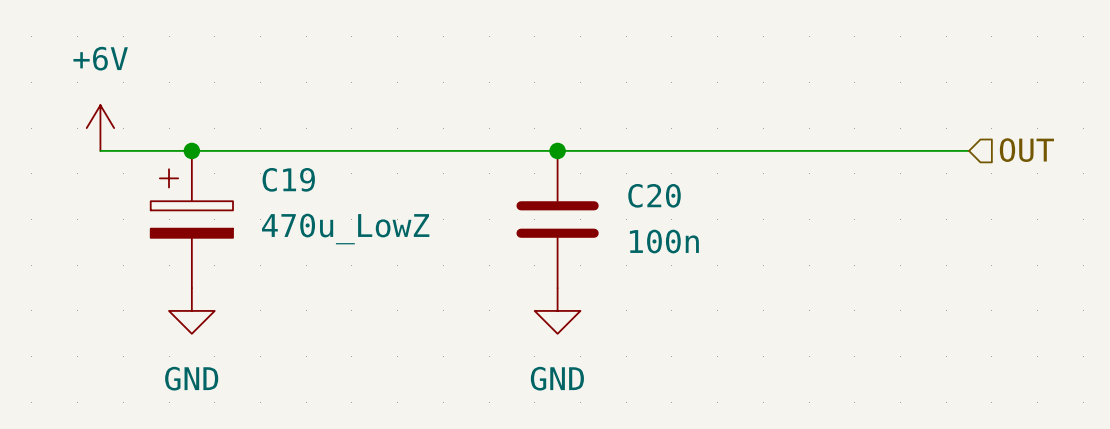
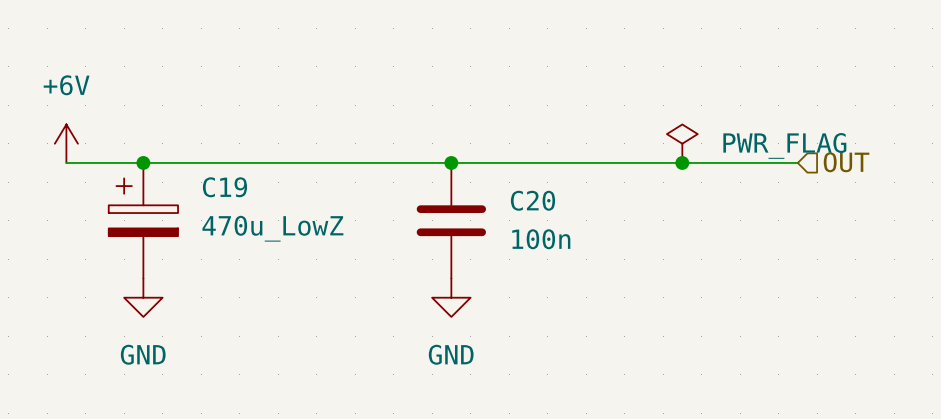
power symbol: none -> PWR_FLAG (682, 143)
junction: none -> (682, 162)

